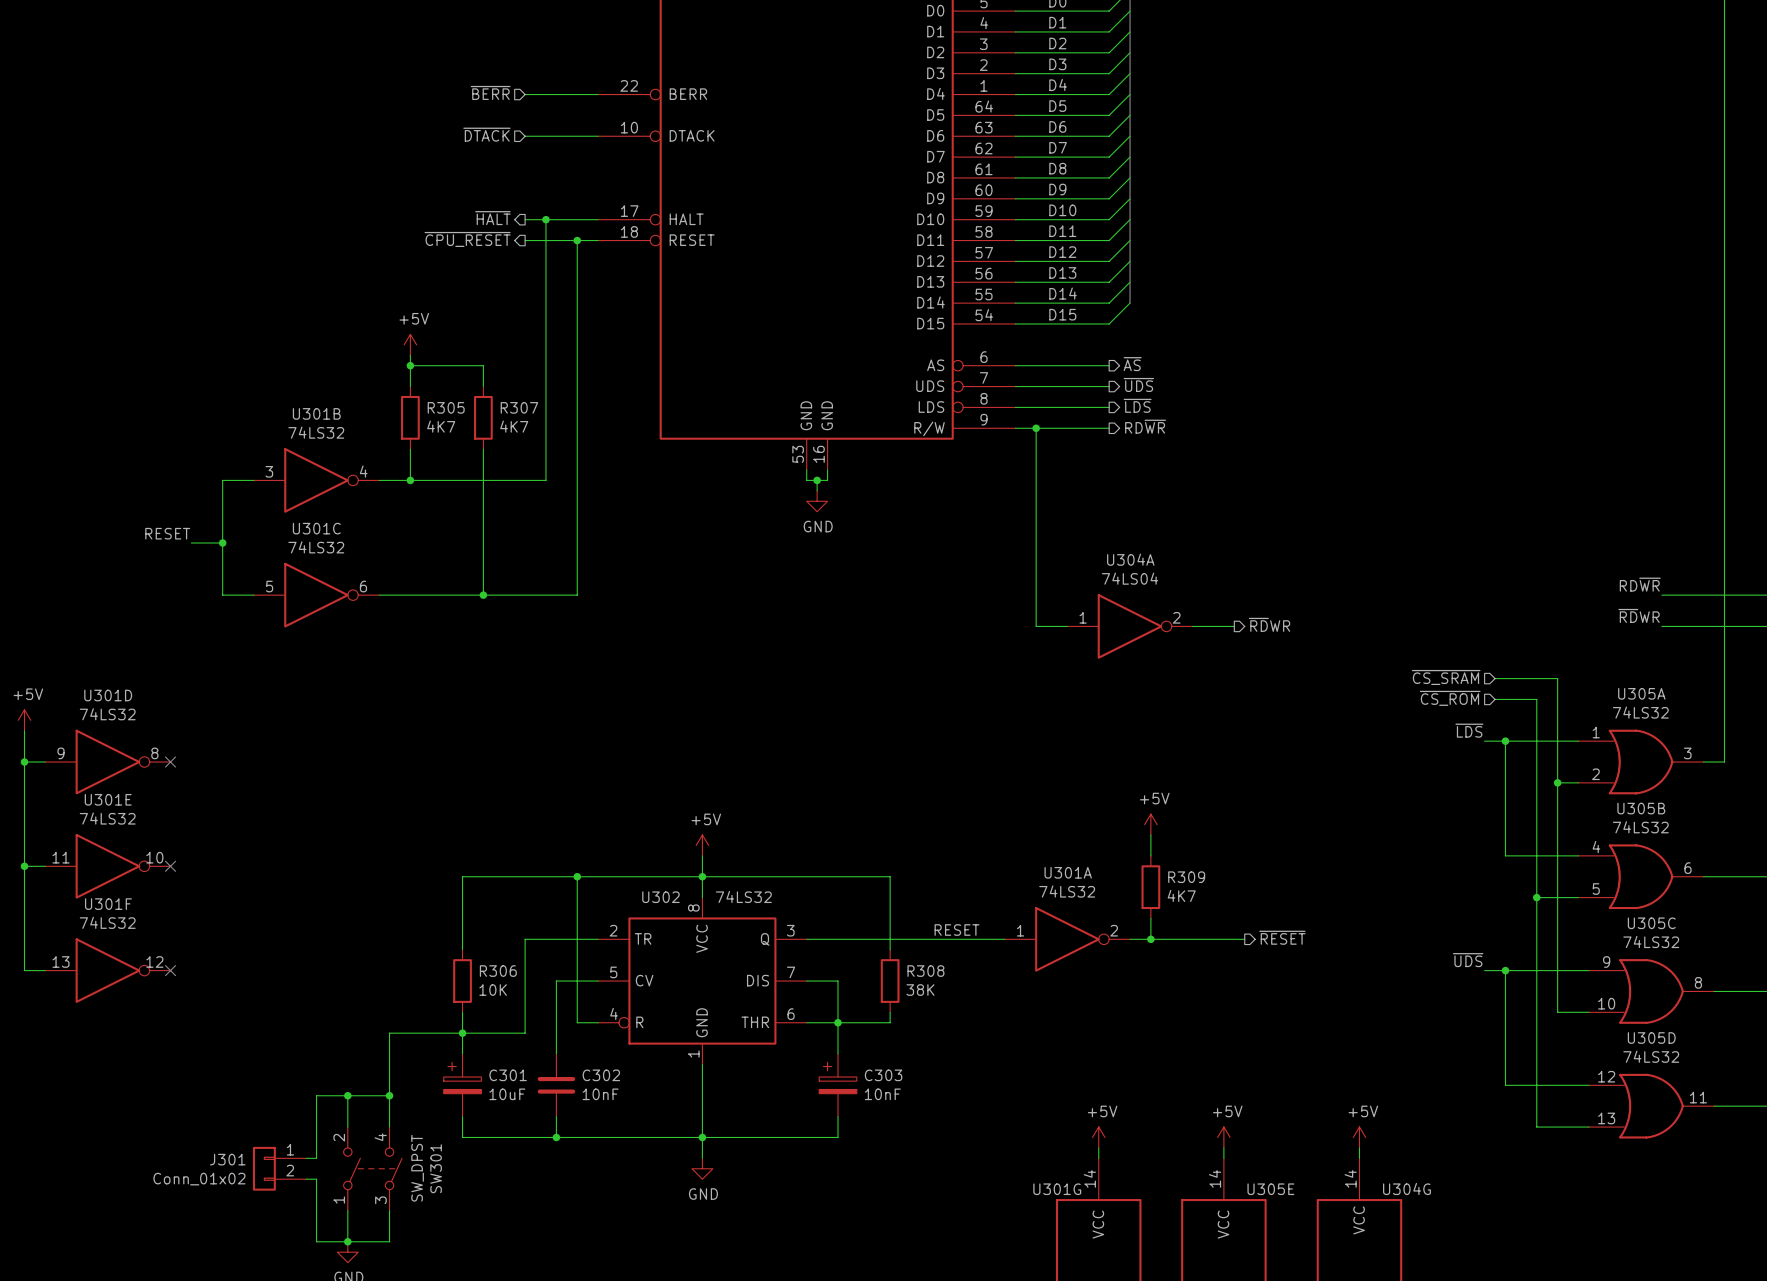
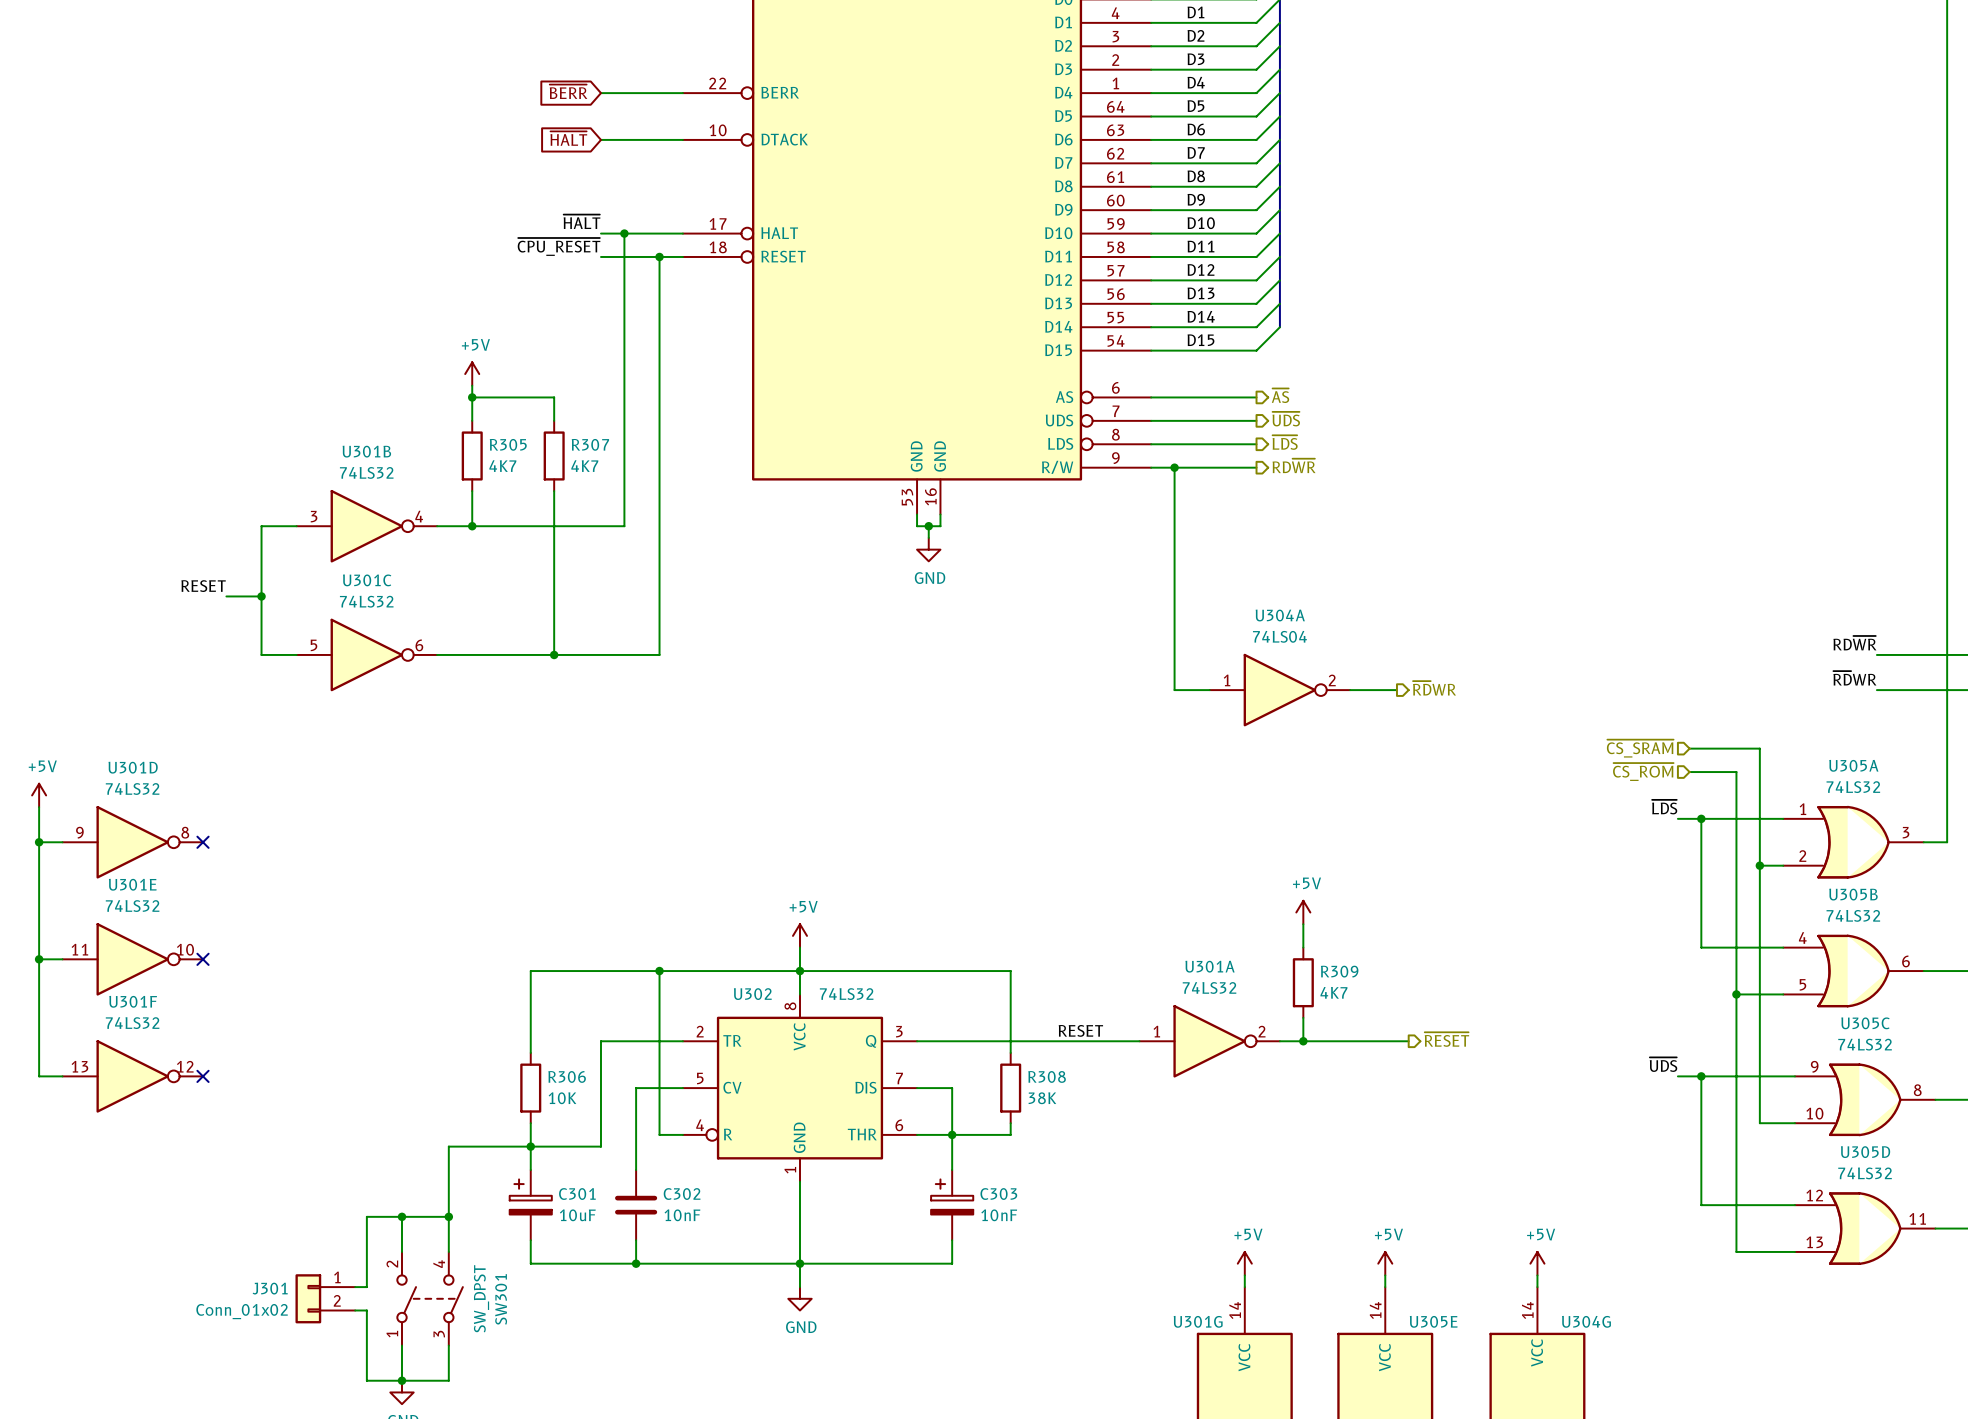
hierarchical label: ~{BERR} (490, 92) -> none
global label: none -> ~{BERR} (568, 91)
hierarchical label: ~{DTACK} (486, 134) -> none
global label: none -> ~{HALT} (568, 138)
label: none -> ~{HALT} (581, 221)
hierarchical label: ~{HALT} (492, 218) -> none
label: none -> ~{CPU_RESET} (559, 246)
hierarchical label: ~{CPU_RESET} (467, 239) -> none

